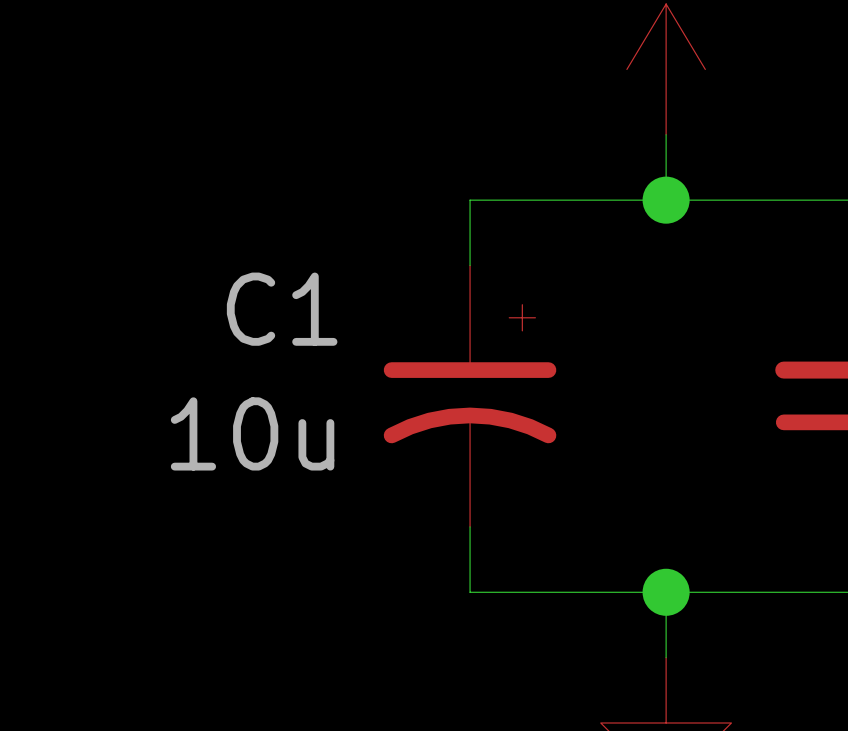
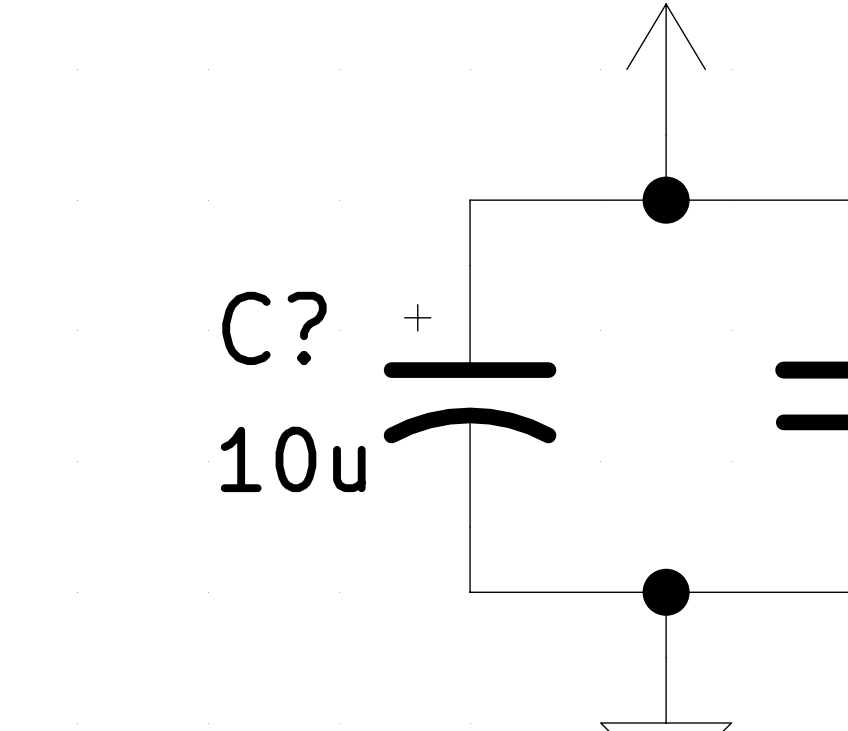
C1: 10u (470, 396) -> none
C?: none -> 10u (470, 396)

